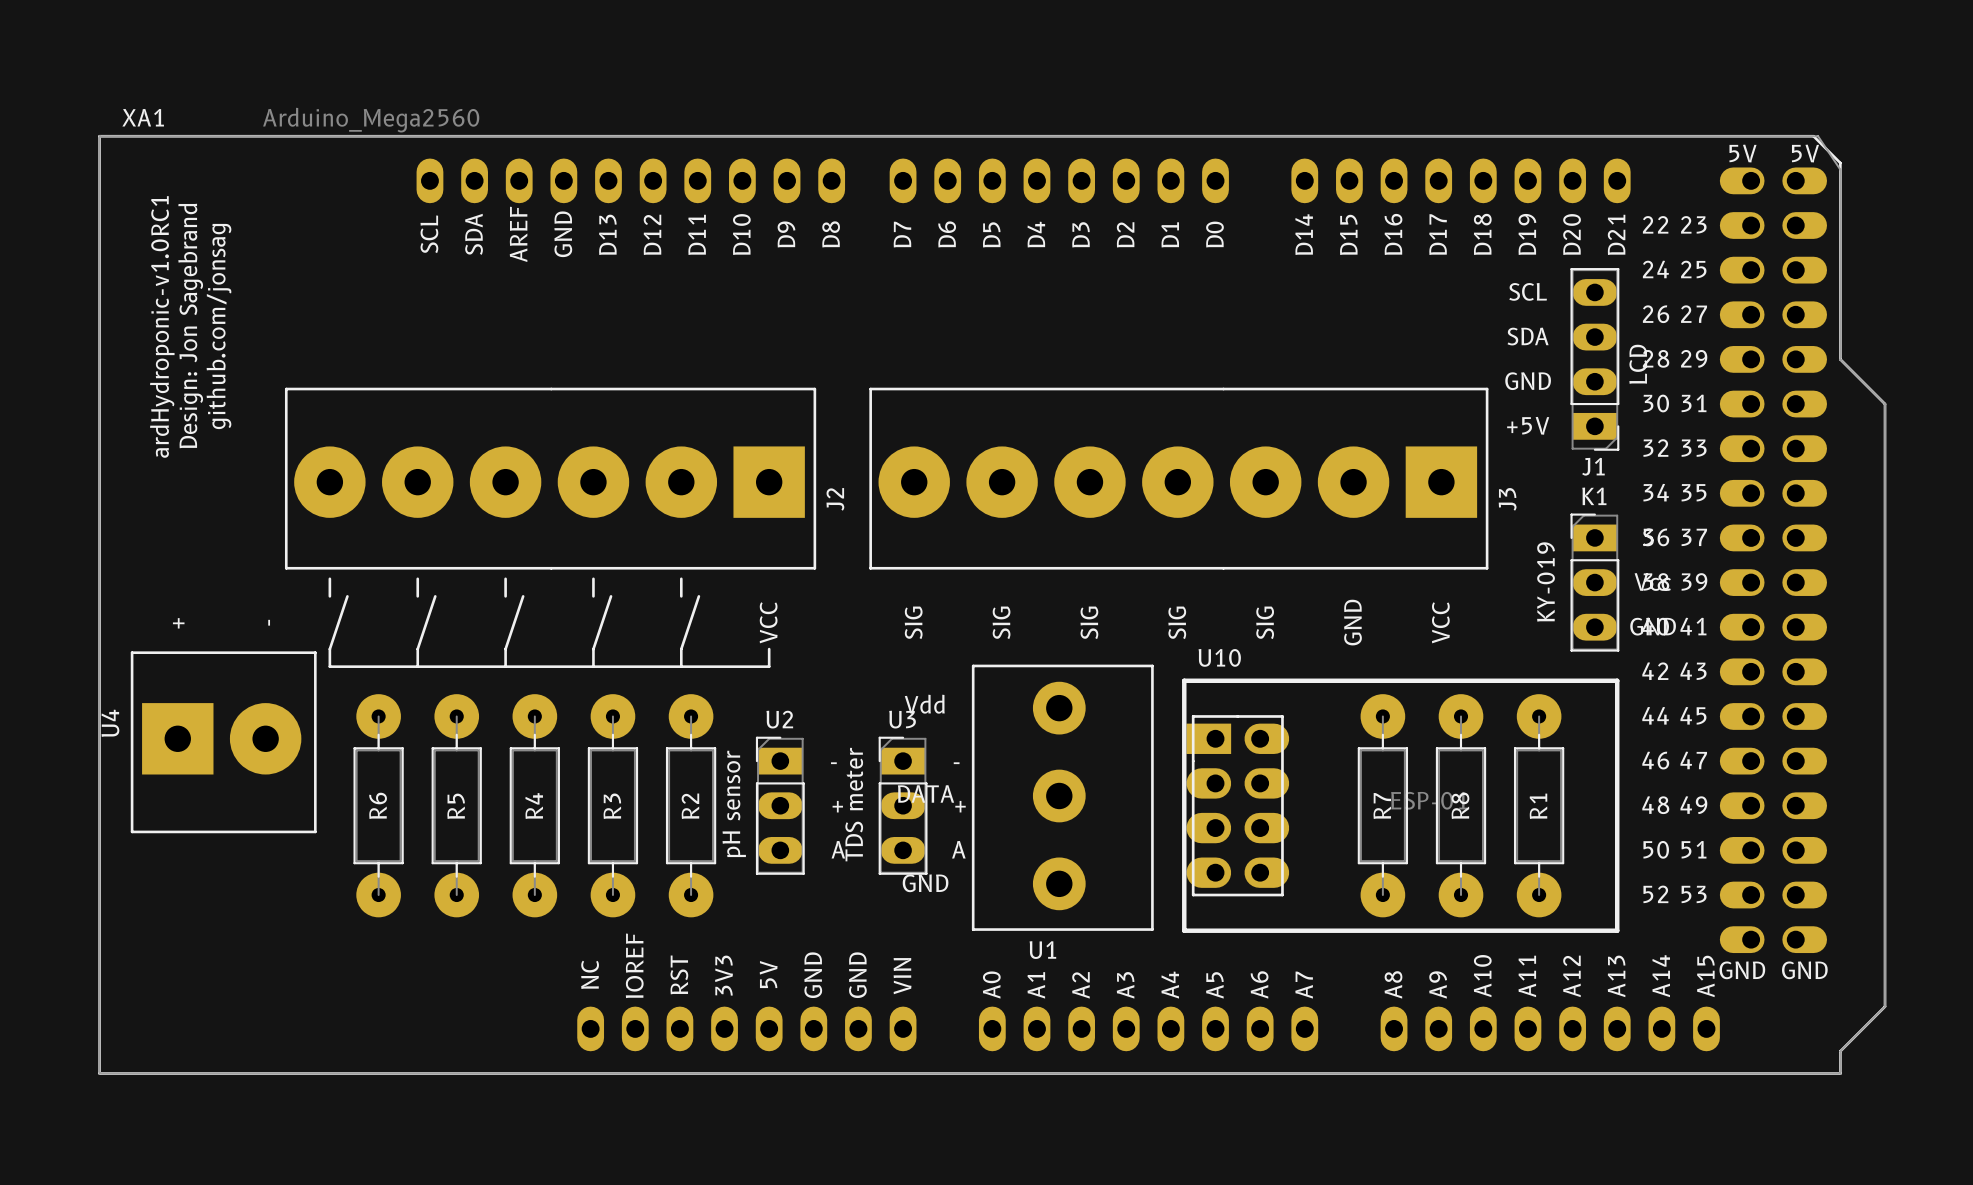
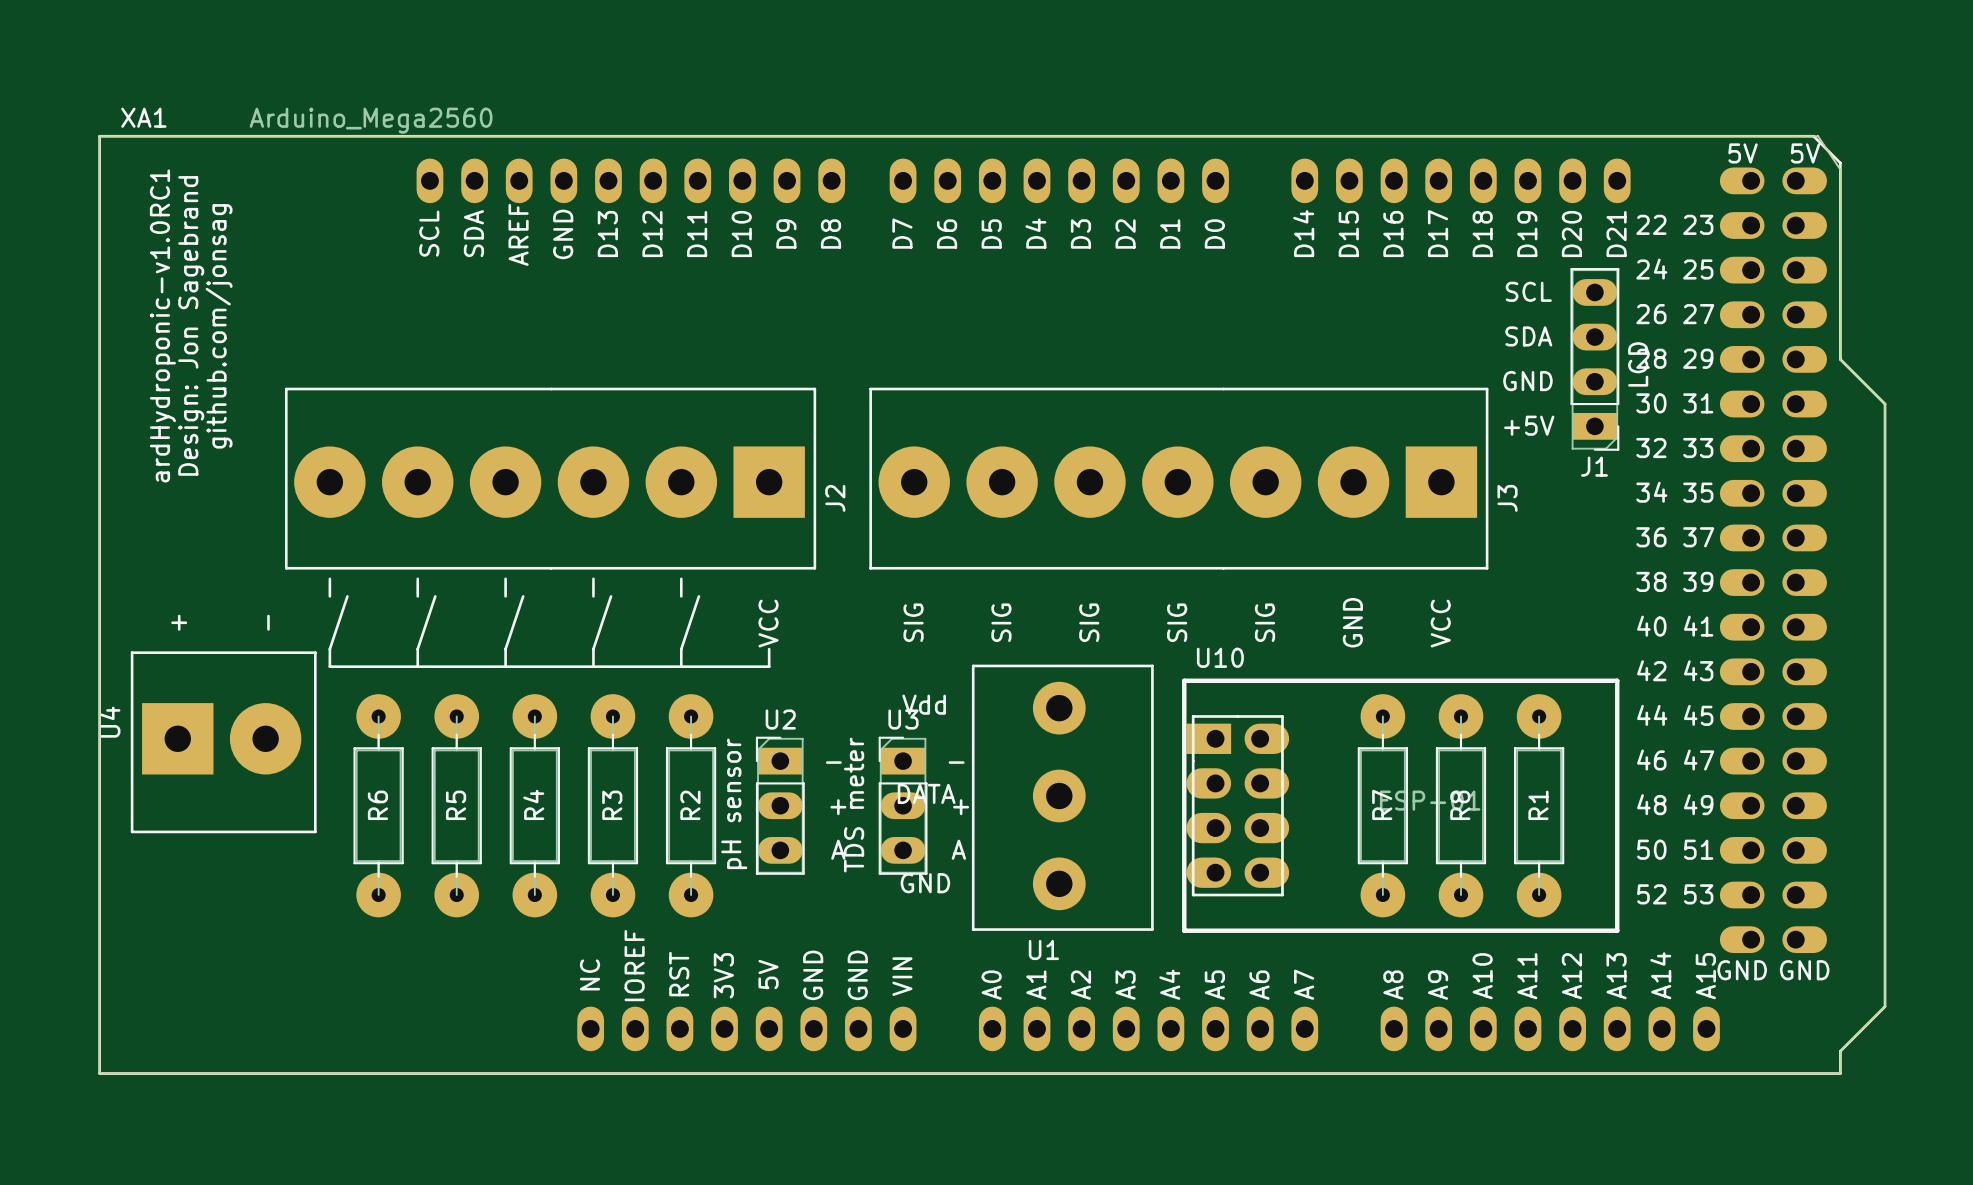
K1: (1594, 582) -> none

